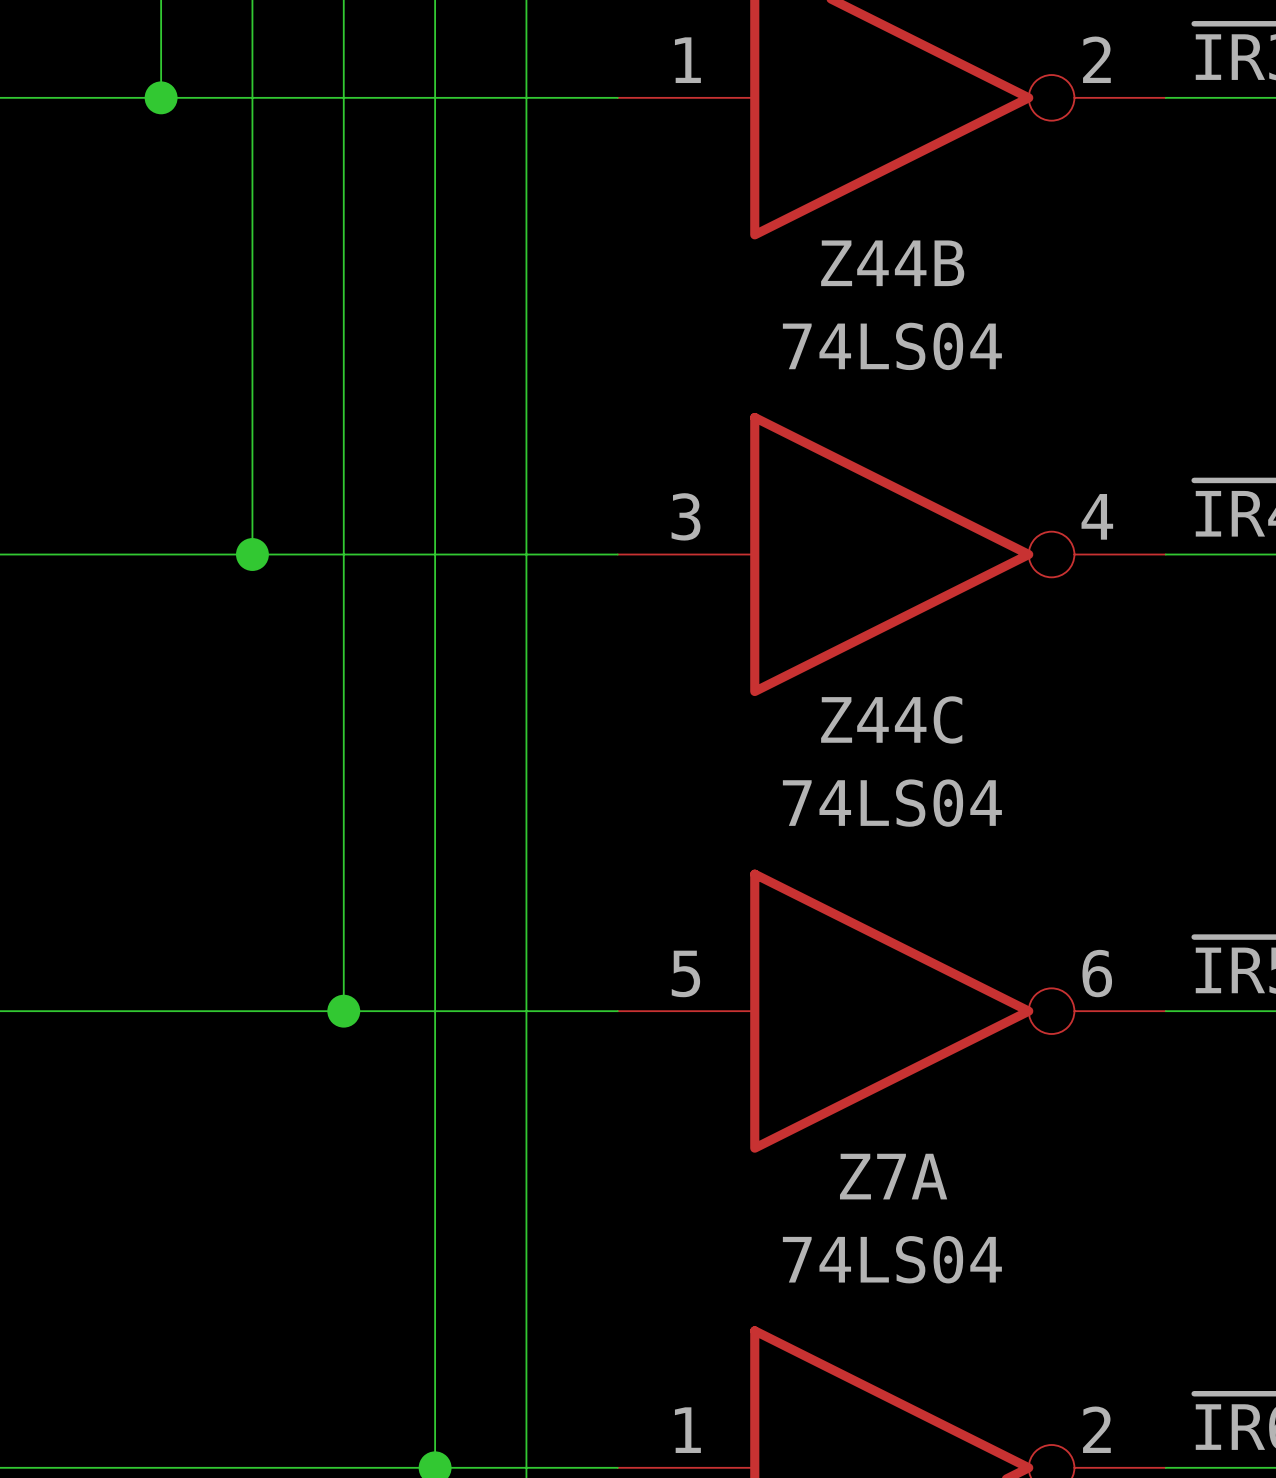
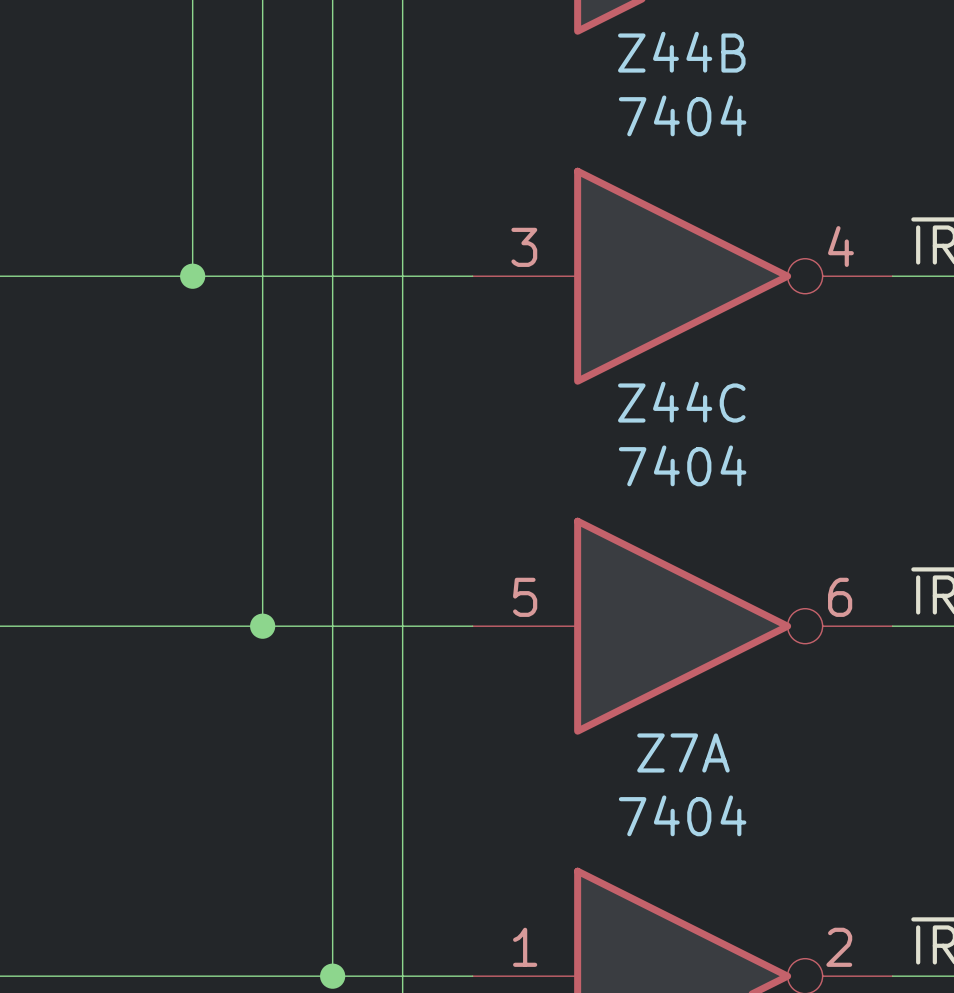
Z44B value: 74LS04 (892, 346) -> 7404 (682, 115)
Z44C value: 74LS04 (892, 803) -> 7404 (682, 465)
Z7A value: 74LS04 (892, 1259) -> 7404 (682, 815)

